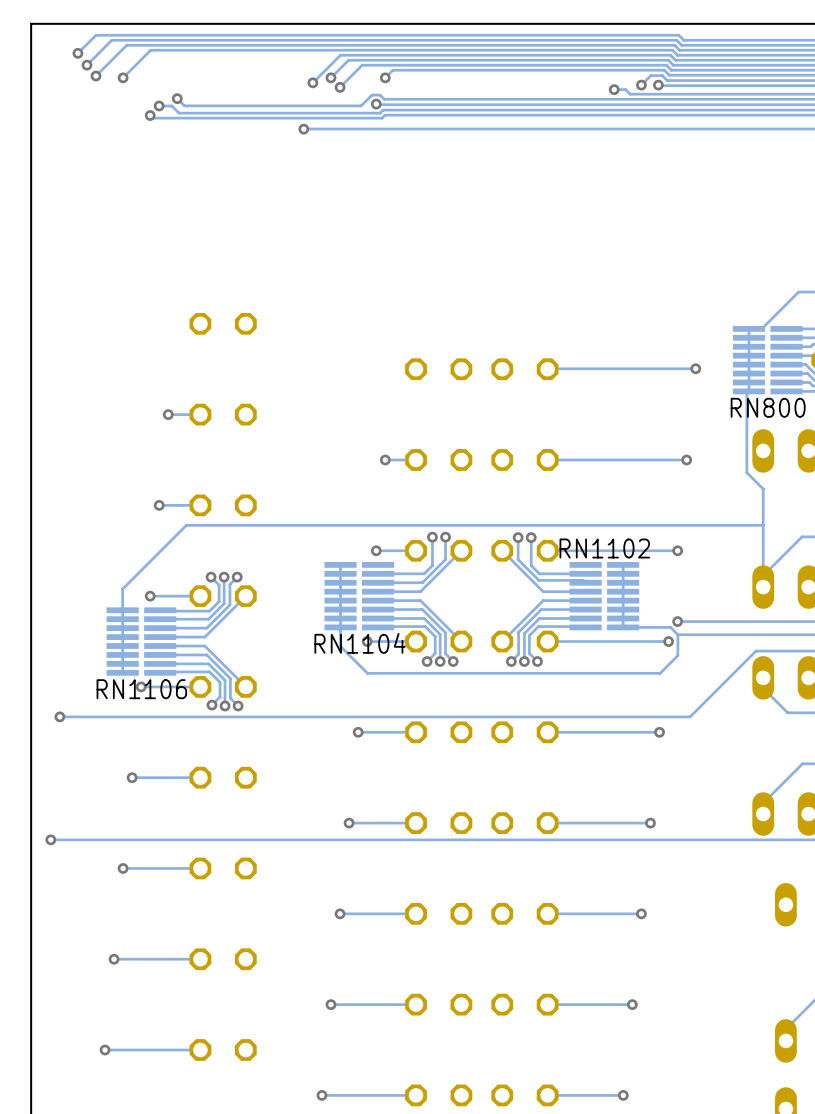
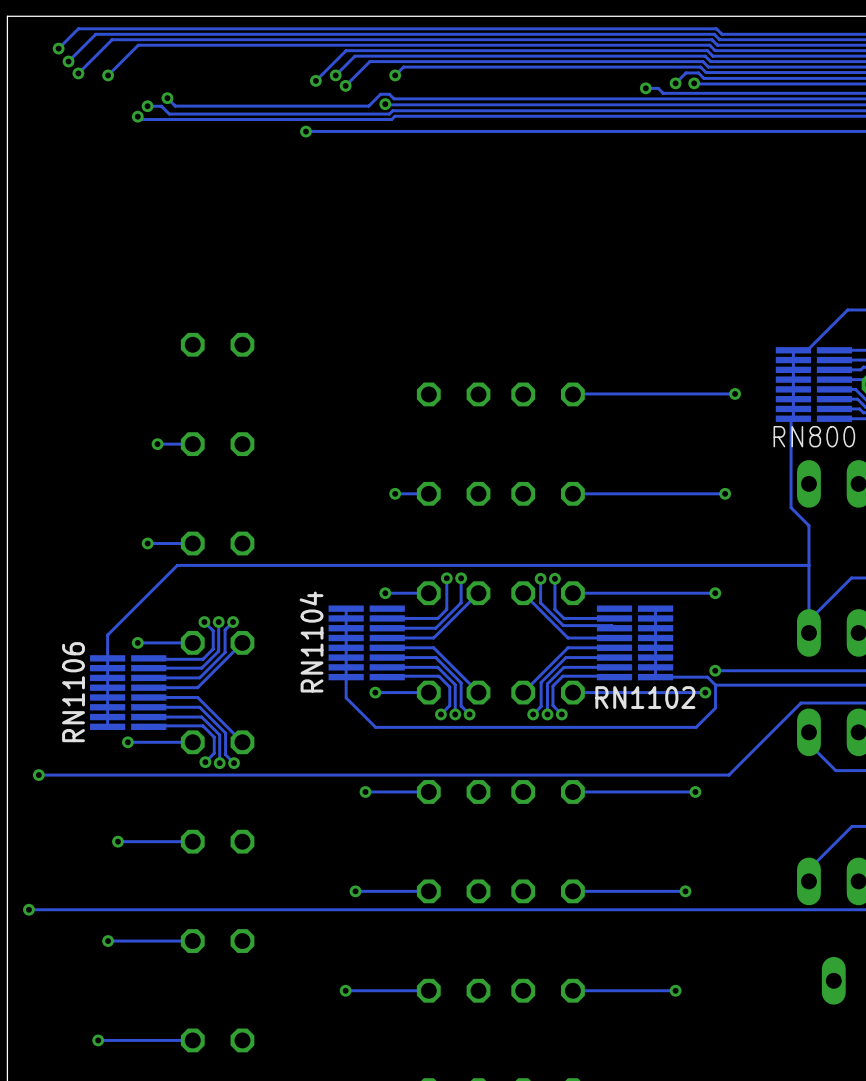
RN1102 name position: RN1102 (604, 548) -> RN1102 (645, 697)
RN1104 name rotation: 0° (360, 643) -> 90° counterclockwise (311, 642)
RN1106 name rotation: 0° (141, 689) -> 90° counterclockwise (73, 692)

